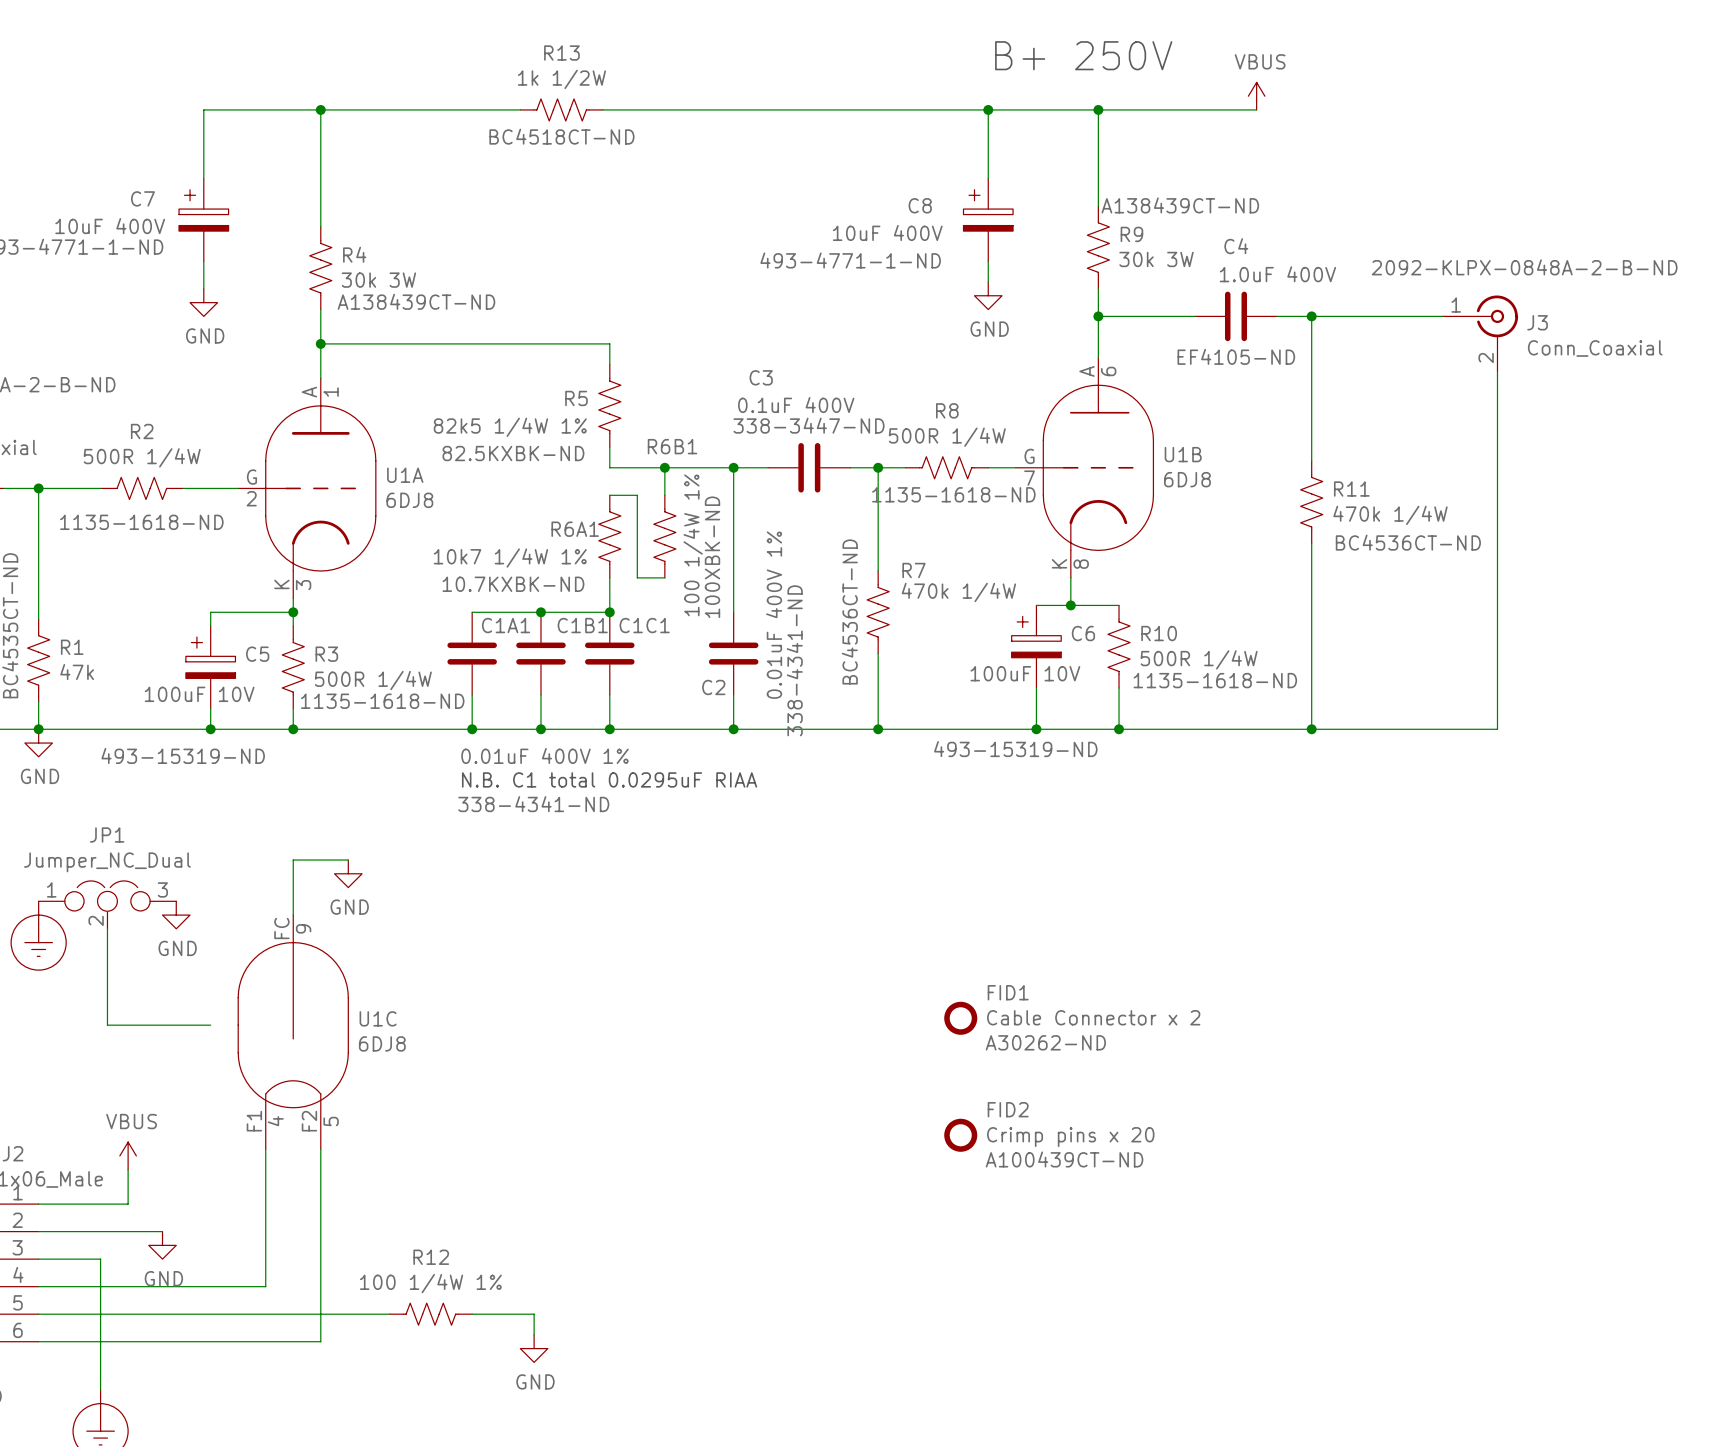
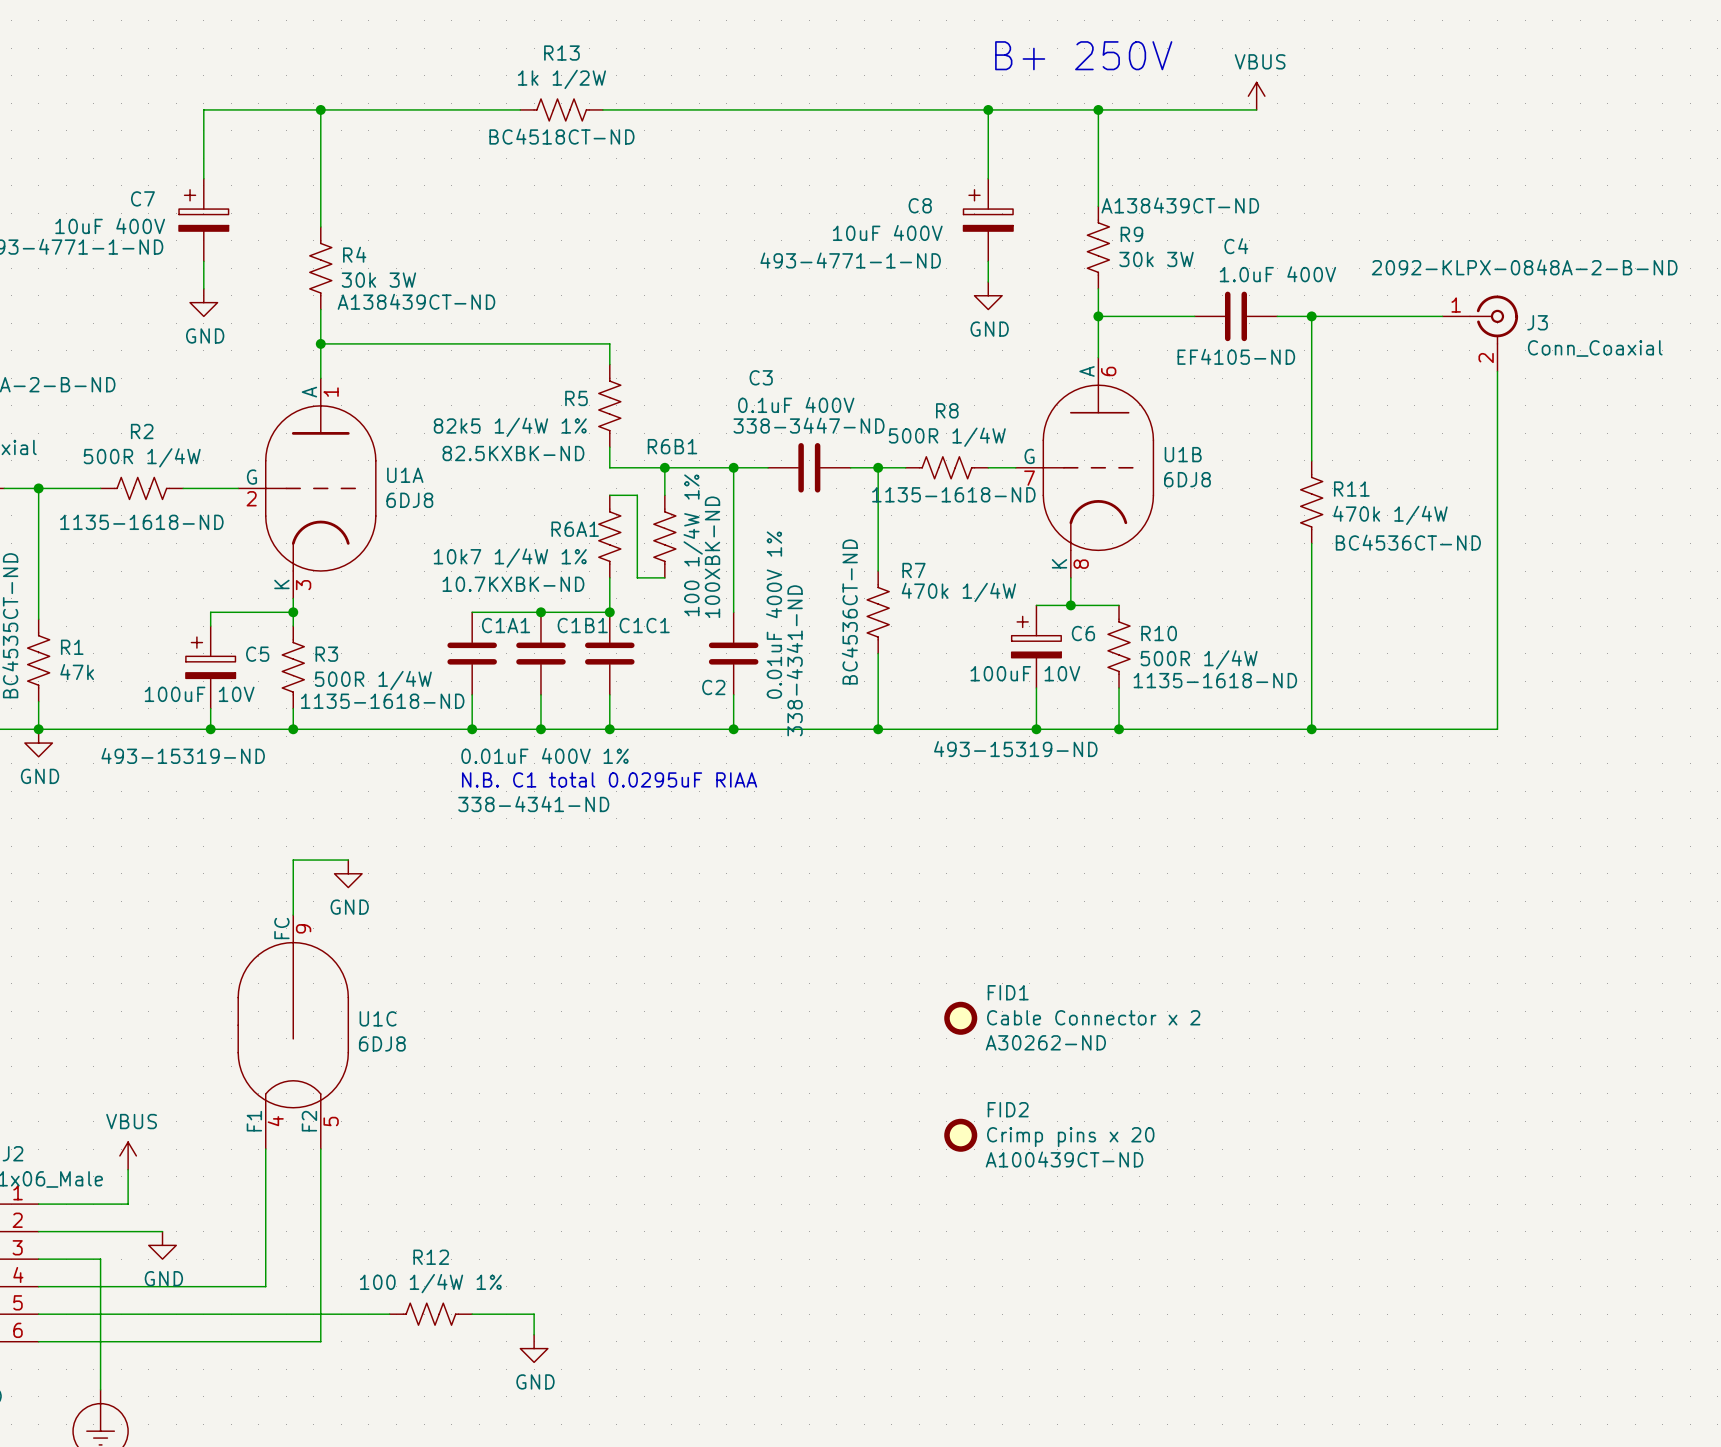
JP1: Jumper_NC_Dual (107, 904) -> none
power symbol: GND (176, 915) -> none
wire: (107, 928) (107, 1025) (210, 1025) -> none
power symbol: (38, 935) -> none

